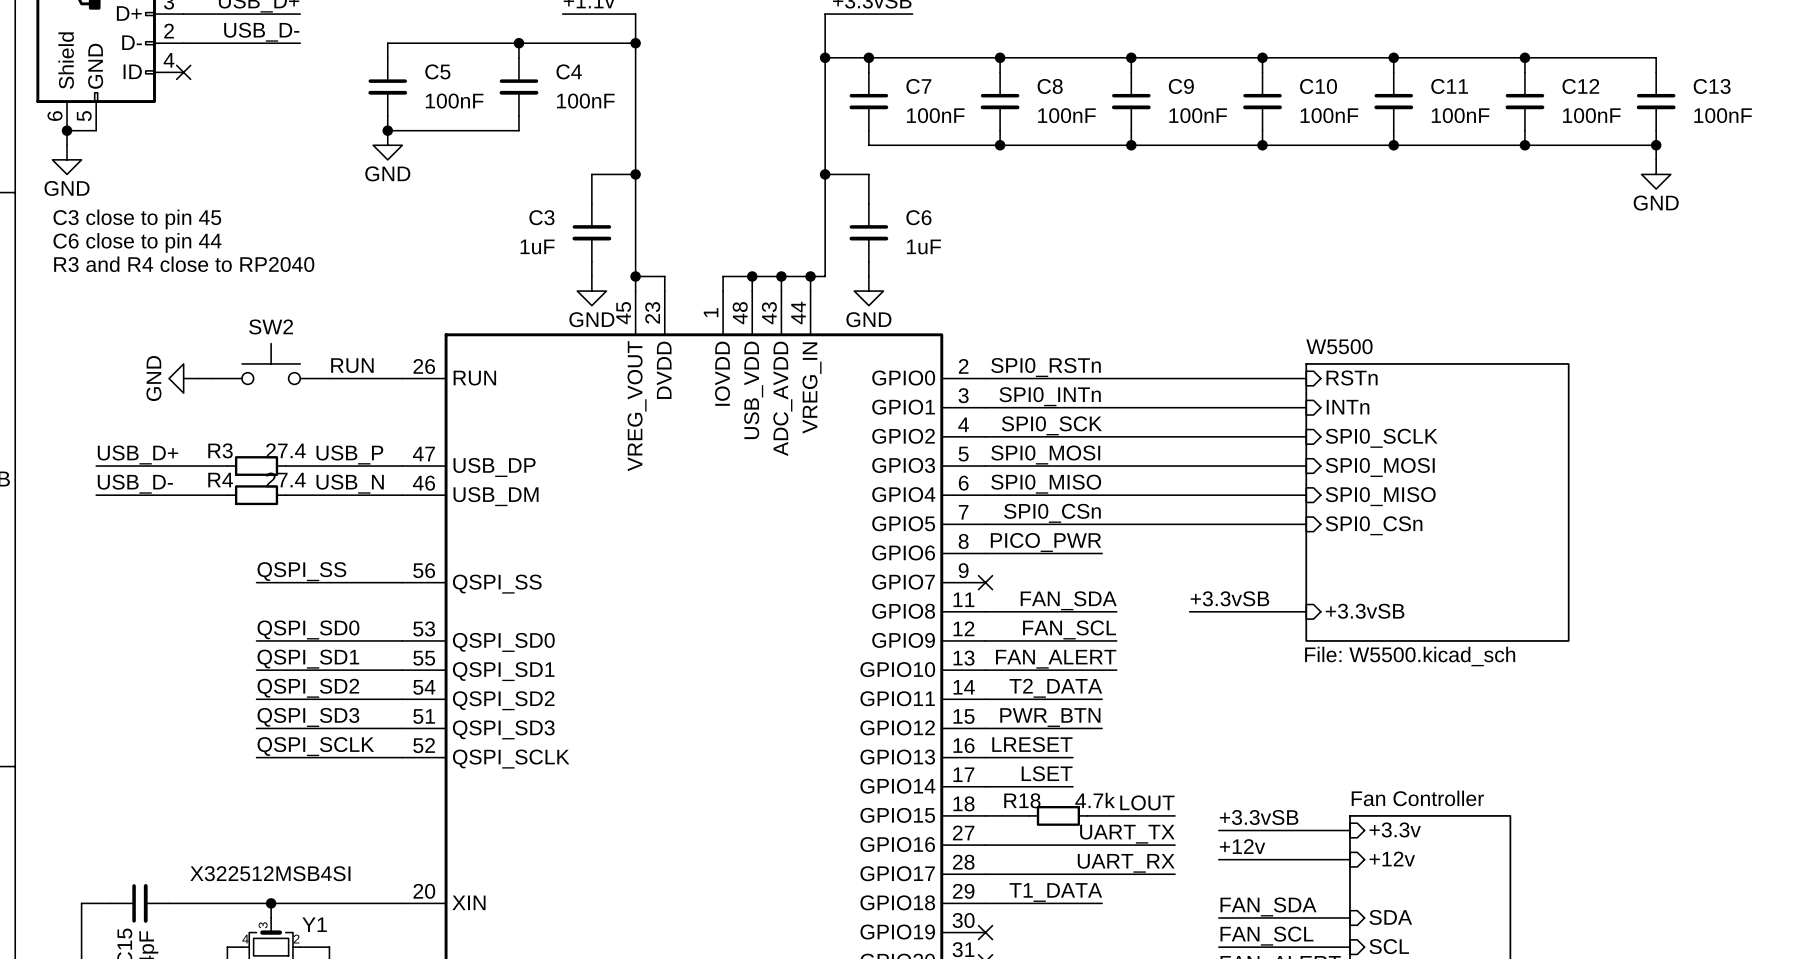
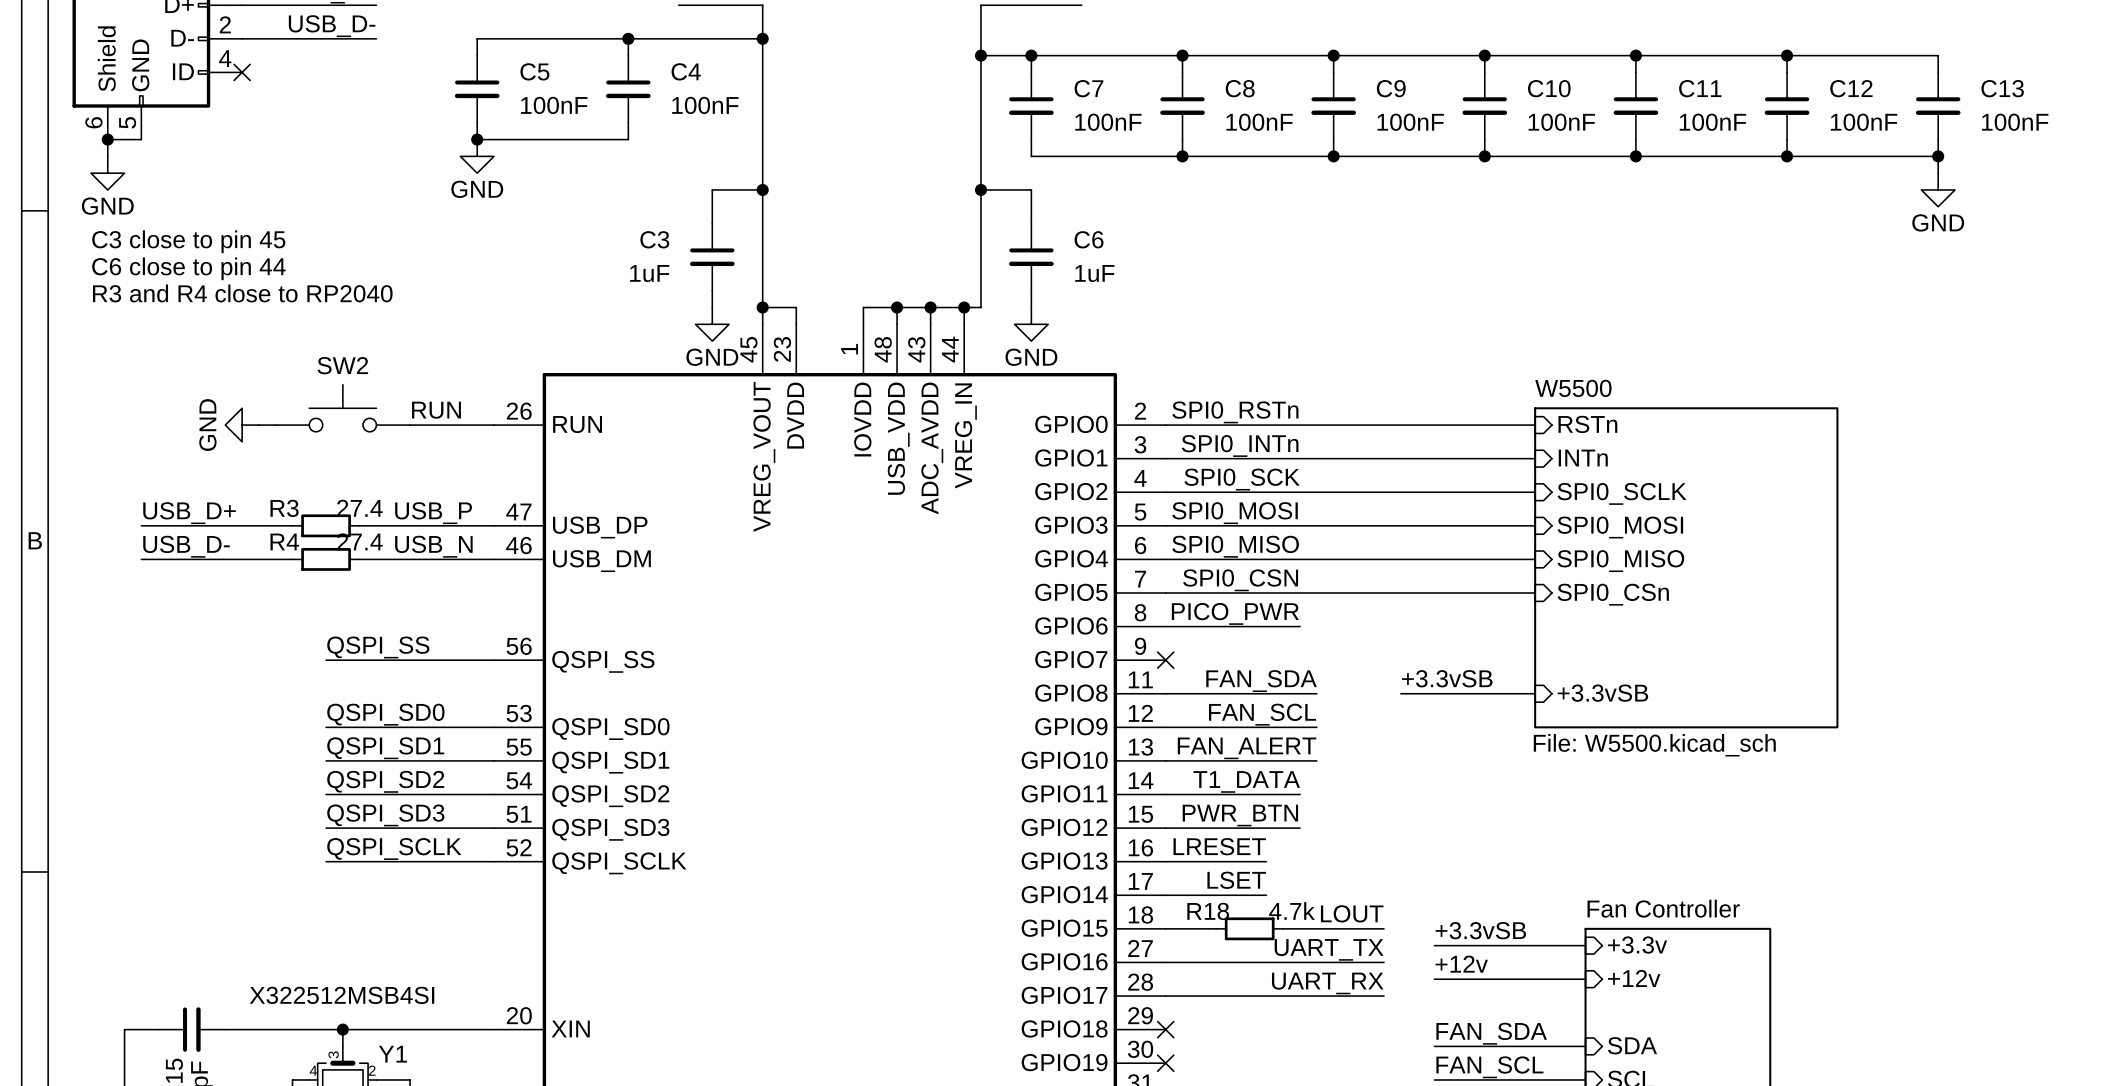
label: SPI0_CSn (1052, 513) -> SPI0_CSN (1240, 580)
label: T2_DATA (1055, 688) -> T1_DATA (1246, 781)
label: T1_DATA (1055, 892) -> none
wire: (985, 903) (1102, 903) -> none
no-connect mark: none -> (1165, 1029)

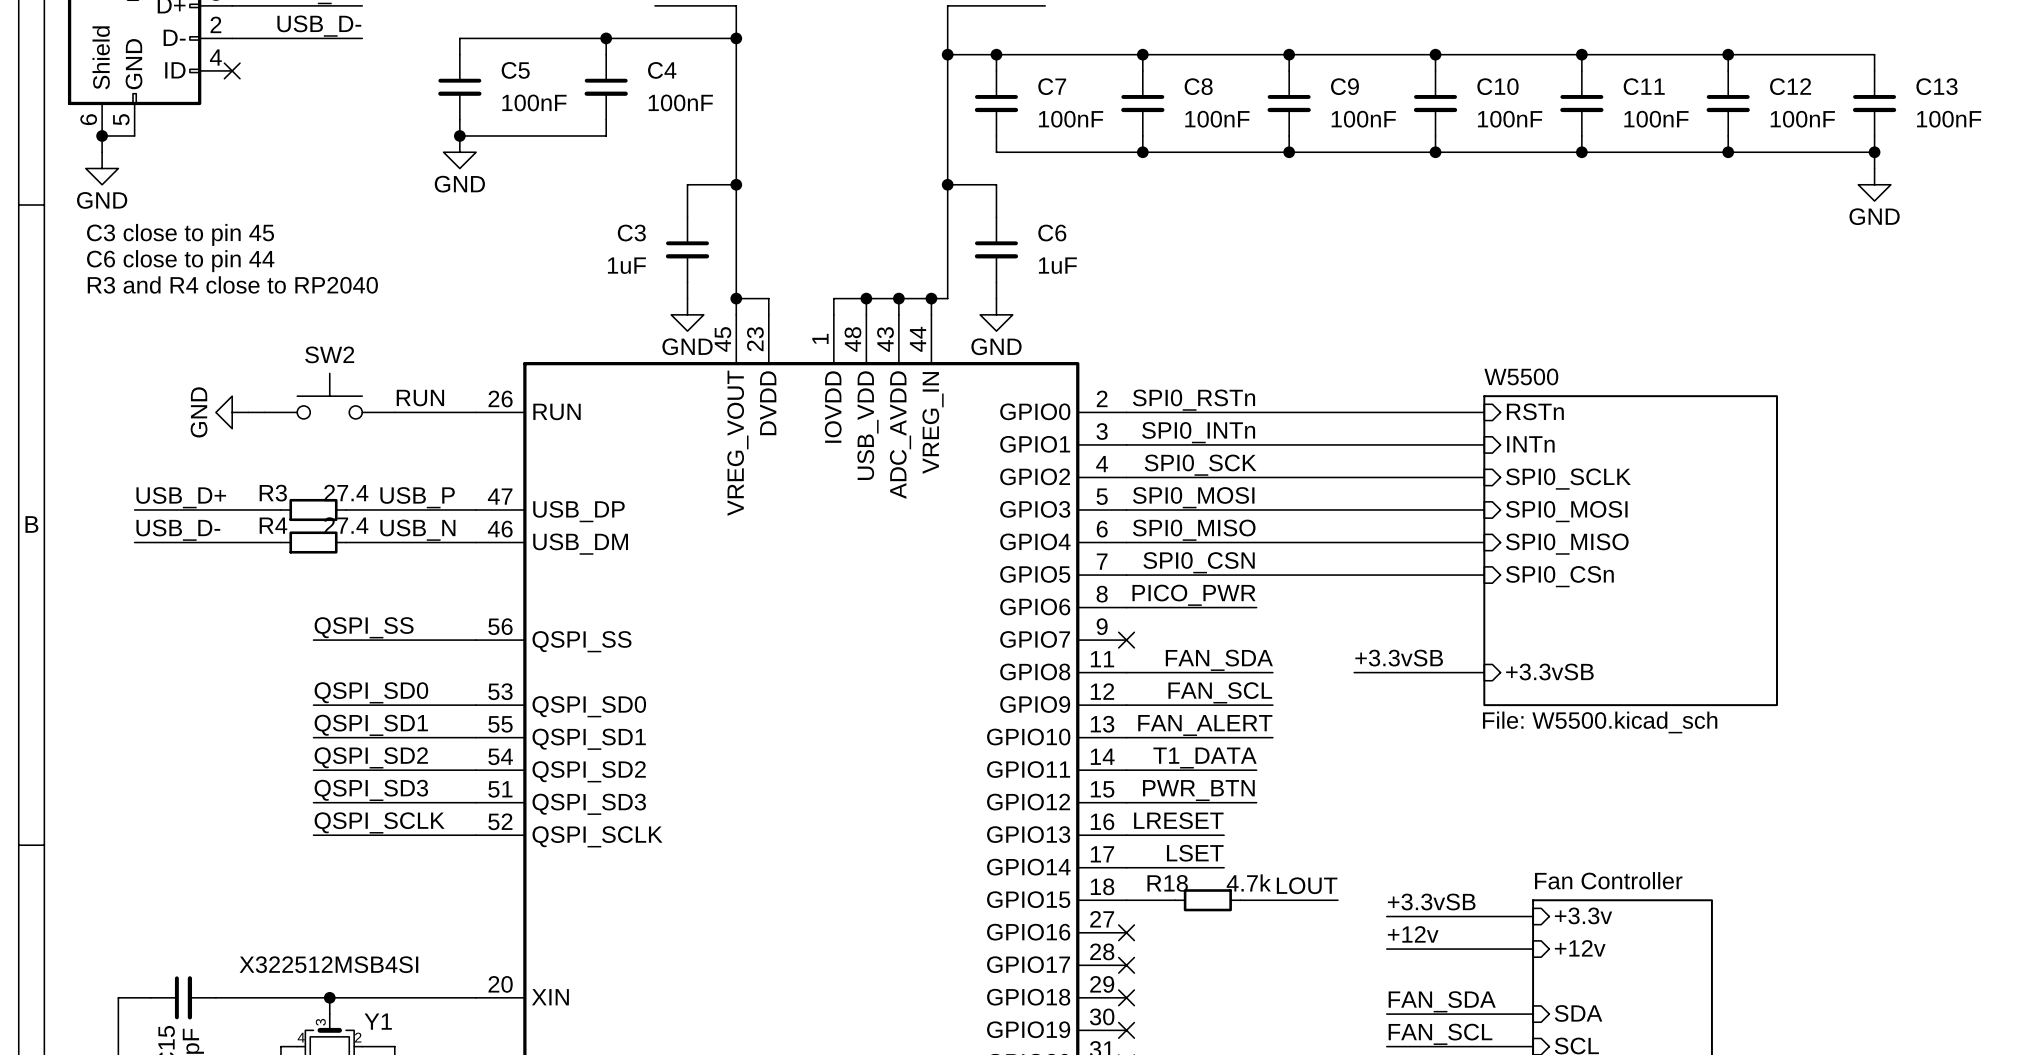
label: UART_TX (1329, 949) -> none
wire: (1165, 962) (1384, 962) -> none
no-connect mark: none -> (1126, 932)
label: UART_RX (1327, 983) -> none
wire: (1165, 996) (1384, 996) -> none
no-connect mark: none -> (1126, 965)

